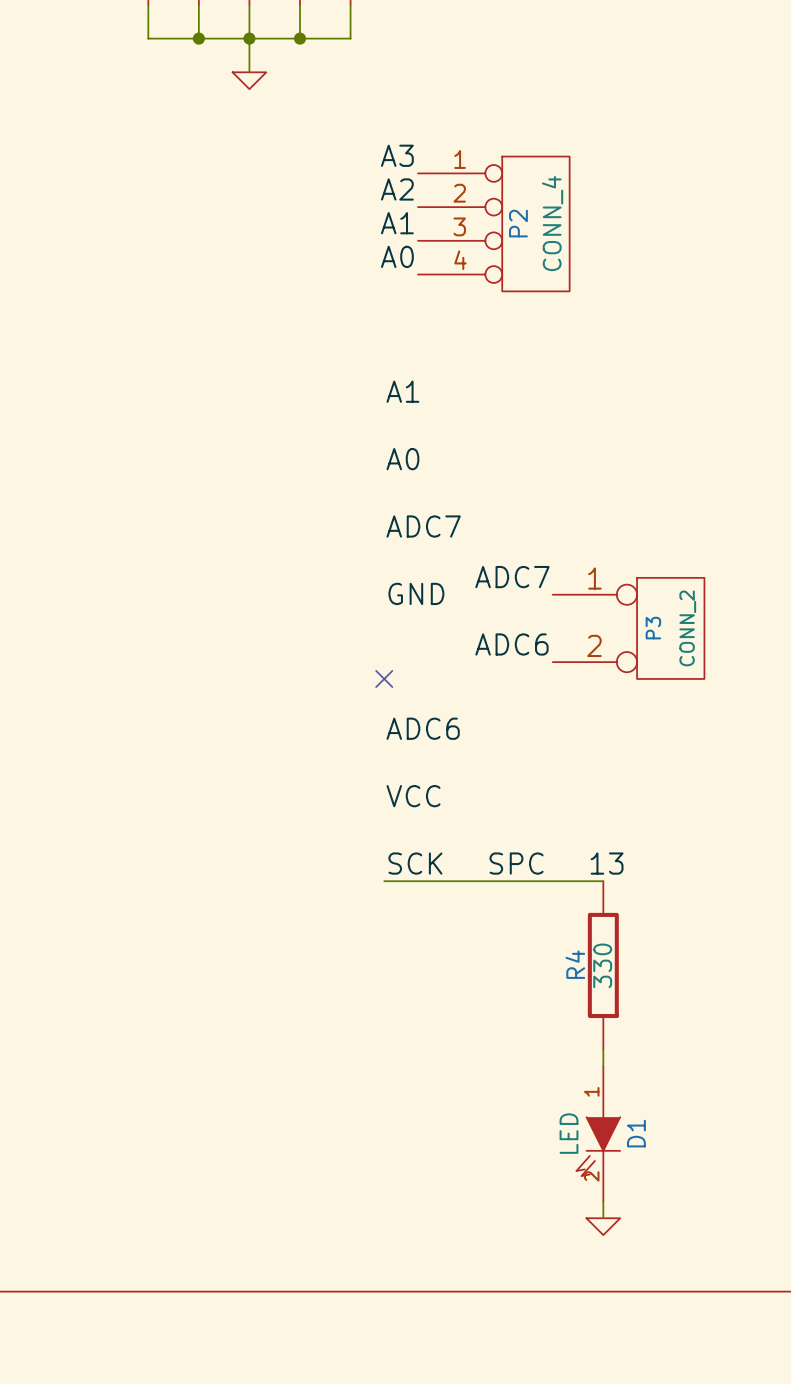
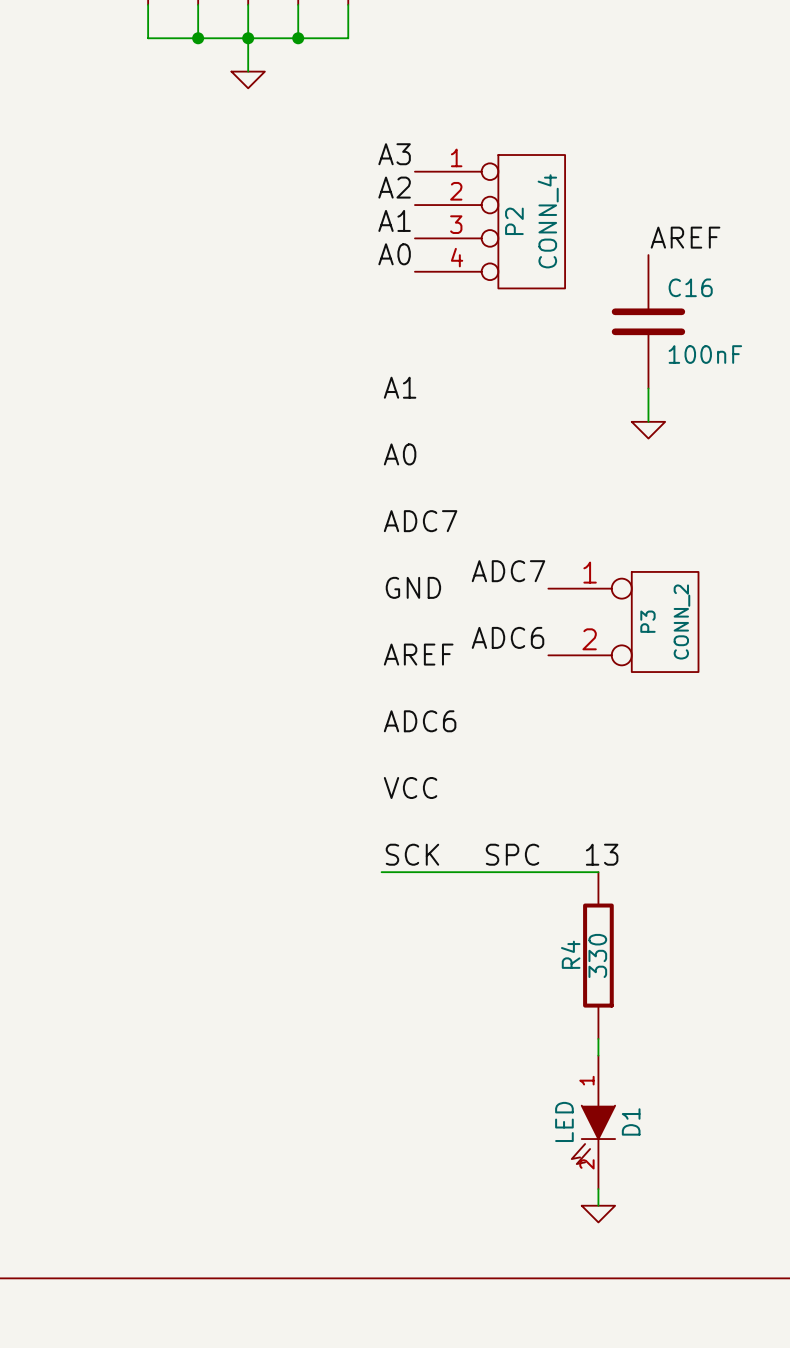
label: none -> AREF (685, 237)
C16: none -> 100nF (648, 321)
wire: none -> (648, 388) (648, 421)
power symbol: none -> (648, 430)
label: none -> AREF (418, 654)
no-connect mark: (384, 678) -> none

